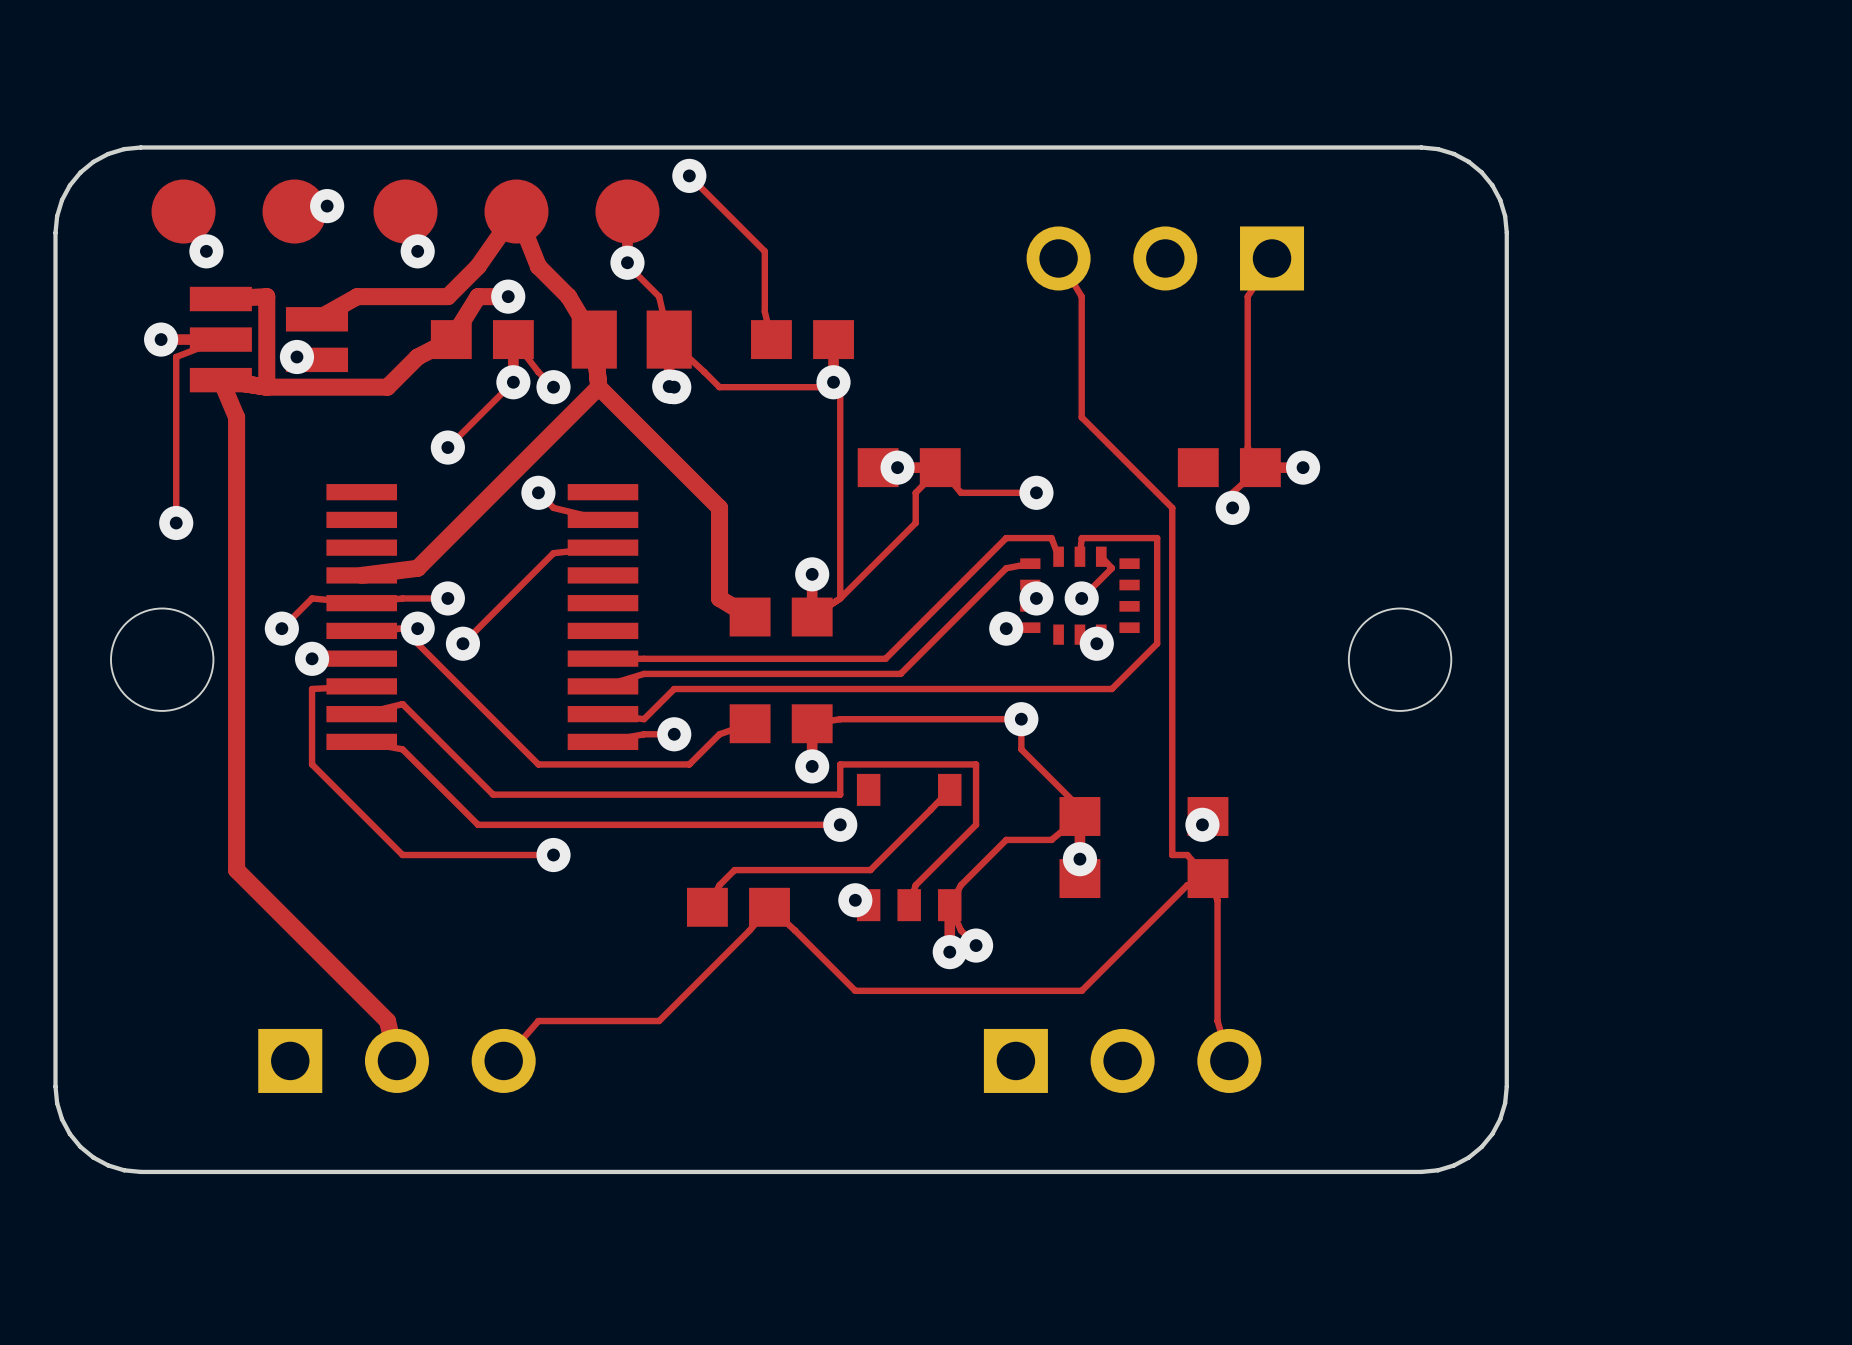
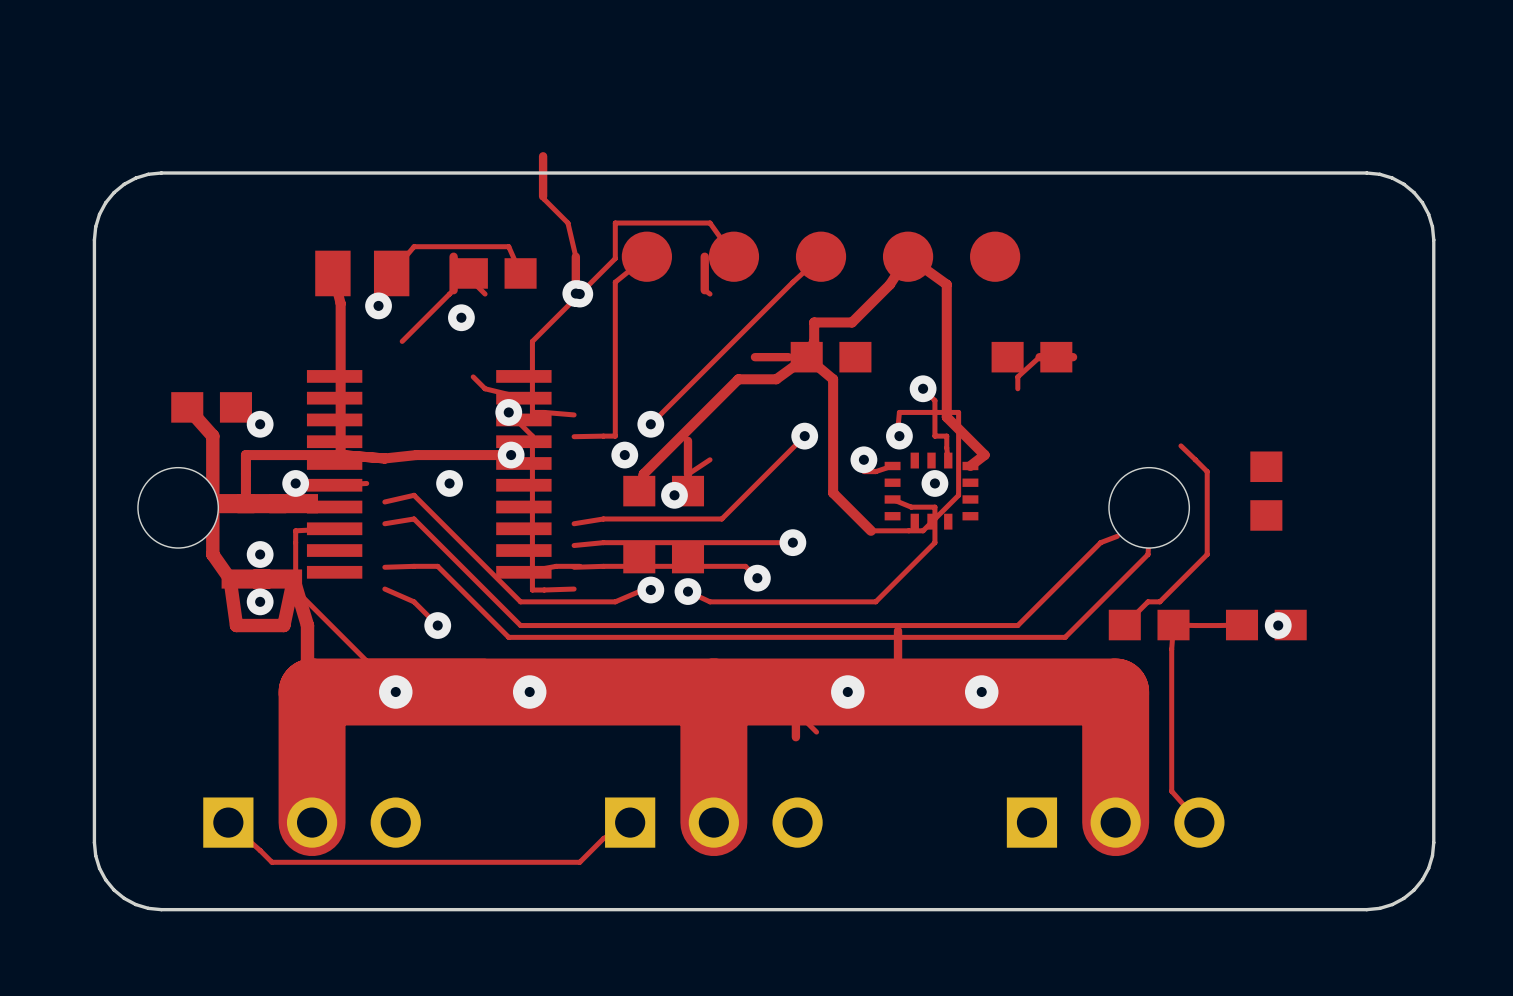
track: (689, 175) (764, 251) (764, 311) (771, 339) -> none
via: (689, 175) -> none
via: (327, 206) -> none
part: (183, 211) -> none
part: (294, 211) -> none
part: (405, 211) -> none
part: (516, 211) -> none
part: (627, 211) -> none
via: (206, 251) -> none
via: (417, 251) -> none
track: (1058, 258) (1081, 296) (1081, 417) (1172, 507) (1172, 855) (1187, 855) (1207, 878) -> none
part: (1165, 258) -> none
track: (1272, 258) (1247, 296) (1247, 447) (1260, 467) -> none
via: (627, 262) -> none
track: (508, 296) (478, 296) (451, 339) (417, 356) (387, 387) (266, 387) -> none
via: (508, 296) -> none
track: (220, 299) (266, 296) (266, 387) -> none
board edge: (55, 318) (55, 232) (57, 216) (61, 200) (69, 185) (80, 172) (93, 161) (108, 153) (124, 149) (140, 147) (1421, 147) (1438, 149) (1454, 153) (1468, 161) (1481, 172) (1492, 185) (1500, 200) (1505, 216) (1506, 232) (1506, 1086) (1505, 1103) (1500, 1119) (1492, 1133) (1481, 1146) (1468, 1157) (1454, 1165) (1438, 1170) (1421, 1171) -> (94, 239) (99, 214) (114, 192) (135, 178) (161, 173) (1366, 173) (1392, 178) (1404, 184) (1414, 192) (1428, 214) (1433, 239) (1433, 842) (1428, 868) (1414, 890) (1392, 904) (1379, 908) (1165, 909)
track: (316, 319) (357, 296) (447, 296) (478, 266) (516, 211) (538, 266) (568, 296) (594, 339) (598, 387) -> none
track: (161, 339) (220, 339) (176, 356) (176, 523) -> none
via: (161, 339) -> none
part: (268, 339) -> none
part position: (482, 339) -> (496, 273)
part position: (631, 339) -> (362, 273)
track: (669, 339) (719, 387) (840, 387) (840, 598) (915, 523) (915, 492) (940, 467) (960, 492) (1036, 492) -> none
part: none -> (646, 256)
part: (802, 339) -> none
track: none -> (733, 256) (710, 223) (615, 223) (615, 258) (532, 341) (532, 412) (574, 414)
part: none -> (733, 256)
track: none -> (821, 256) (792, 282) (650, 424)
part: none -> (821, 256)
part: none -> (908, 256)
part: none -> (995, 256)
via: (296, 356) -> none
track: none -> (332, 273) (340, 303) (340, 455)
track: none -> (520, 273) (508, 246) (414, 246) (391, 273) (378, 305)
via: (513, 382) -> none
via: (833, 382) -> none
track: (266, 387) (220, 380) (236, 417) (236, 870) (387, 1021) (396, 1060) -> none
via position: (553, 387) -> (461, 317)
track: (598, 387) (719, 507) -> (646, 256) (615, 282) (615, 388)
track: (598, 387) (417, 568) (361, 575) -> none
via: none -> (378, 305)
via: (447, 447) -> none
via: (897, 467) -> none
part position: (909, 467) -> (831, 357)
track: none -> (806, 357) (814, 341) (814, 322) (852, 322) (889, 284) (908, 256) (946, 284) (946, 417) (984, 455) (970, 465)
track: none -> (806, 357) (776, 379) (738, 379) (643, 474) (639, 491)
part position: (1229, 467) -> (1031, 357)
via: (1303, 467) -> none
via: (538, 492) -> none
via: (1036, 492) -> none
track width: thick (719, 507) (719, 568) -> thin (615, 388) (615, 436)
track: none -> (923, 388) (934, 400) (934, 436) (946, 436) (948, 460)
via: none -> (923, 388)
via: (1232, 507) -> none
via: (176, 523) -> none
track: none -> (187, 407) (212, 436) (212, 554) (230, 579) (236, 625) (283, 625) (293, 579) (307, 625) (307, 696) (312, 692)
part: none -> (211, 407)
via: none -> (508, 412)
track: (602, 547) (553, 553) (462, 643) -> none
via: none -> (260, 424)
via: none -> (650, 424)
track: (1058, 556) (1051, 538) (1006, 538) (885, 658) (602, 658) -> none
track: (1101, 556) (1111, 568) (1081, 598) -> none
track: (1030, 563) (1006, 568) (900, 673) (855, 673) -> (804, 436) (721, 518)
track: (719, 568) (719, 598) (750, 617) -> (615, 436) (574, 436)
via: none -> (804, 436)
via: (812, 574) -> none
track: none -> (1180, 445) (1207, 471) (1207, 554) (1159, 601) (1148, 601) (1124, 625)
track: none -> (340, 455) (245, 455) (245, 503)
track: none -> (340, 455) (384, 458) (416, 455) (511, 455)
via: none -> (511, 455)
via: none -> (624, 455)
part position: (1079, 595) -> (931, 491)
track: (447, 598) (402, 598) (361, 603) (312, 598) (281, 628) -> none
via: (447, 598) -> none
via position: (1081, 598) -> (899, 436)
track: none -> (892, 465) (875, 471) (863, 471)
part position: (781, 617) -> (663, 491)
via: (281, 628) -> none
via: none -> (295, 483)
track: (417, 628) (402, 628) (538, 764) (613, 764) -> (508, 412) (532, 436) (532, 590)
via: (417, 628) -> none
via: none -> (449, 483)
via: (1006, 628) -> none
part: none -> (1266, 491)
via: (462, 643) -> none
via: none -> (674, 495)
via position: (1096, 643) -> (934, 483)
track: none -> (892, 499) (911, 507) (934, 507) (934, 542) (875, 601) (710, 601) (687, 591) (686, 601)
track: none -> (384, 501) (414, 495) (520, 601) (615, 601) (639, 591) (650, 590)
via: (312, 658) -> none
track: (704, 673) (644, 673) (602, 686) -> (603, 518) (574, 523)
track: none -> (384, 523) (414, 518) (520, 625) (1017, 625) (1100, 542) (1117, 536)
track: (1045, 689) (674, 689) (644, 719) (602, 714) -> (871, 530) (833, 492) (833, 379) (806, 357)
track: none -> (1149, 536) (1148, 554) (1065, 637) (710, 637)
part: none -> (261, 541)
track: none -> (792, 542) (603, 542) (574, 545)
via: none -> (792, 542)
track: (361, 714) (402, 704) (493, 794) (840, 794) (840, 764) (976, 764) (976, 824) (915, 885) (909, 905) -> none
via: none -> (260, 554)
via: (1021, 719) -> none
track: (750, 723) (719, 734) (689, 764) (628, 764) -> (574, 589) (544, 590)
via: (674, 734) -> none
track: none -> (574, 567) (745, 566) (757, 578)
track: (361, 741) (402, 749) (478, 824) (583, 824) -> (384, 567) (437, 566) (508, 637)
via: none -> (757, 578)
track: none -> (384, 589) (414, 601) (437, 625)
via: none -> (650, 590)
track: (812, 766) (812, 723) (840, 719) (1021, 719) (1021, 749) (1081, 809) (1079, 816) (1051, 839) (1006, 839) (960, 885) (949, 905) -> none
via: none -> (260, 601)
track: (949, 789) (870, 870) (734, 870) (719, 885) (707, 907) -> none
part: none -> (1149, 625)
track: none -> (1241, 625) (1173, 625) (1171, 649) (1171, 791) (1199, 822)
part: none -> (1266, 625)
via: none -> (1278, 625)
via: (840, 824) -> none
via: (1202, 824) -> none
part: (909, 847) -> none
part: (1079, 847) -> none
part: (1207, 847) -> none
via position: (553, 855) -> (437, 625)
via: (1079, 859) -> none
track: (1207, 878) (1187, 885) (1081, 990) (855, 990) (769, 907) (749, 930) (659, 1021) (538, 1021) (503, 1060) -> none
track: (1207, 878) (1217, 900) (1217, 1021) (1229, 1060) -> none
track: none -> (312, 692) (312, 822)
track: none -> (312, 692) (1115, 692) (1115, 822)
via: none -> (395, 692)
via: none -> (529, 692)
track: none -> (713, 692) (713, 822)
via: none -> (847, 692)
via: none -> (981, 692)
via: (855, 900) -> none
part: (738, 907) -> none
via: (976, 945) -> none
via: (949, 952) -> none
track: none -> (228, 822) (271, 862) (579, 862) (603, 838) (630, 822)
part position: (396, 1060) -> (312, 822)
part: none -> (713, 822)
part: (1122, 1060) -> none
part: none -> (1115, 822)

